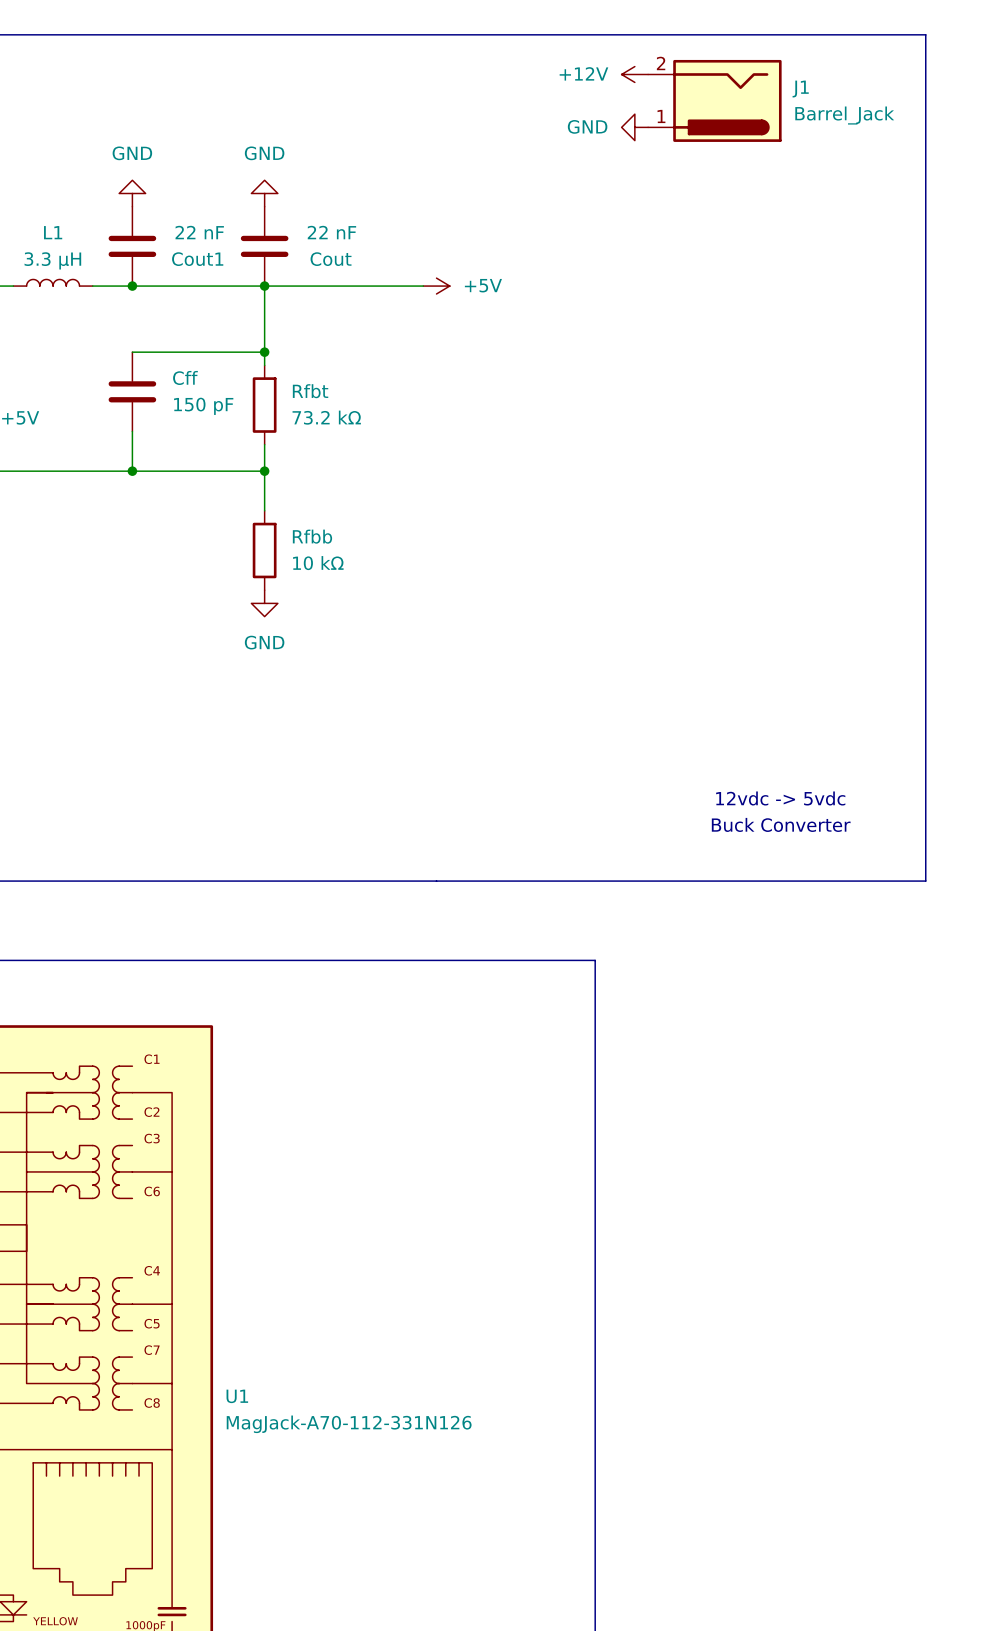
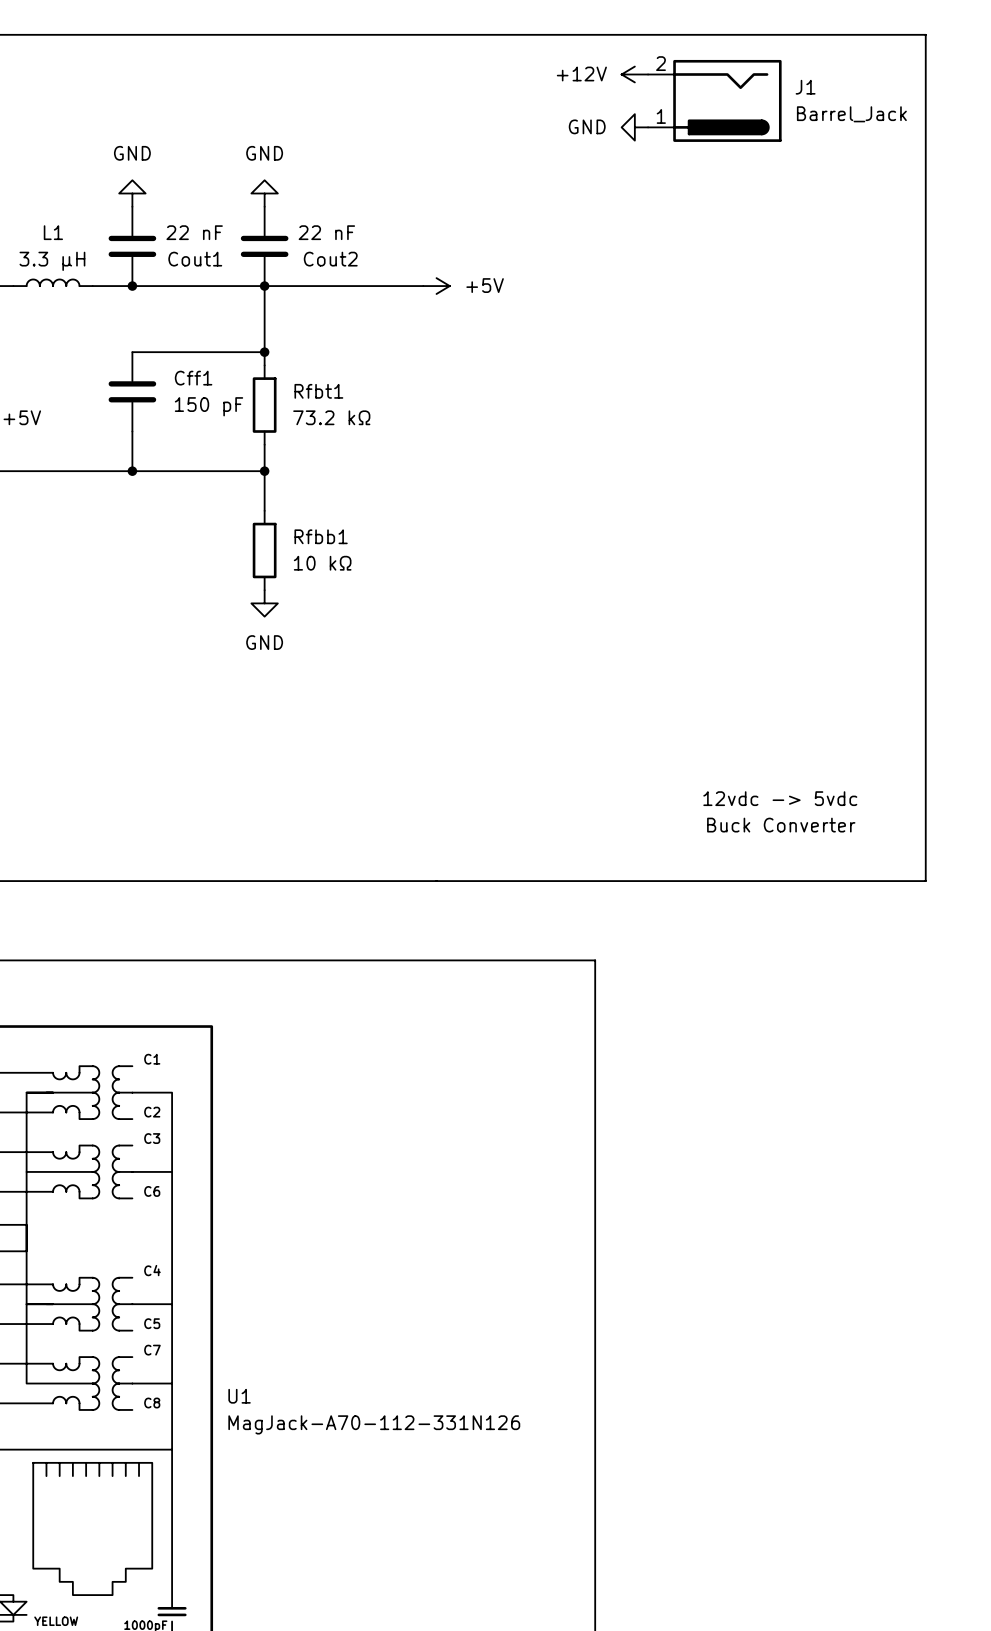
Cout name: Cout (331, 259) -> Cout2 (330, 259)
Cff name: Cff (185, 377) -> Cff1 (193, 378)
Rfbt name: Rfbt (310, 391) -> Rfbt1 (318, 391)
Rfbb name: Rfbb (312, 536) -> Rfbb1 (321, 536)

